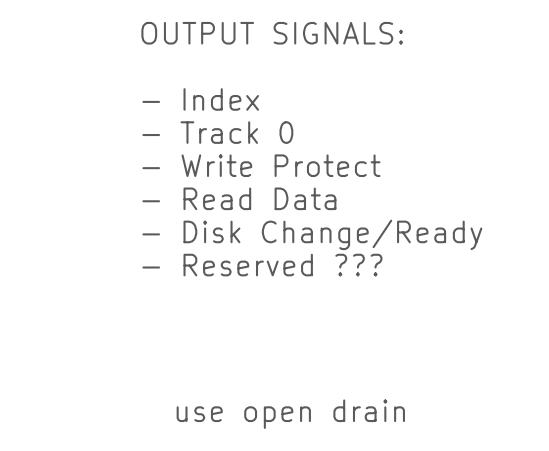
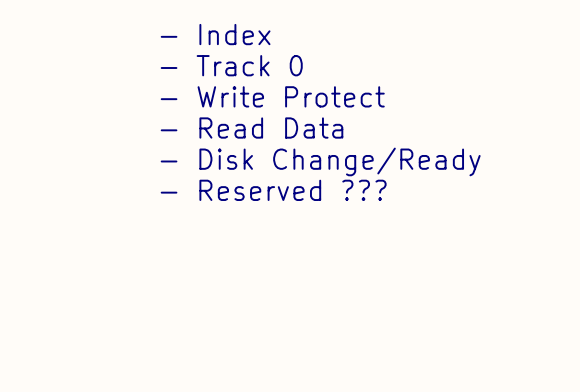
text: use open drain (290, 414) -> none

